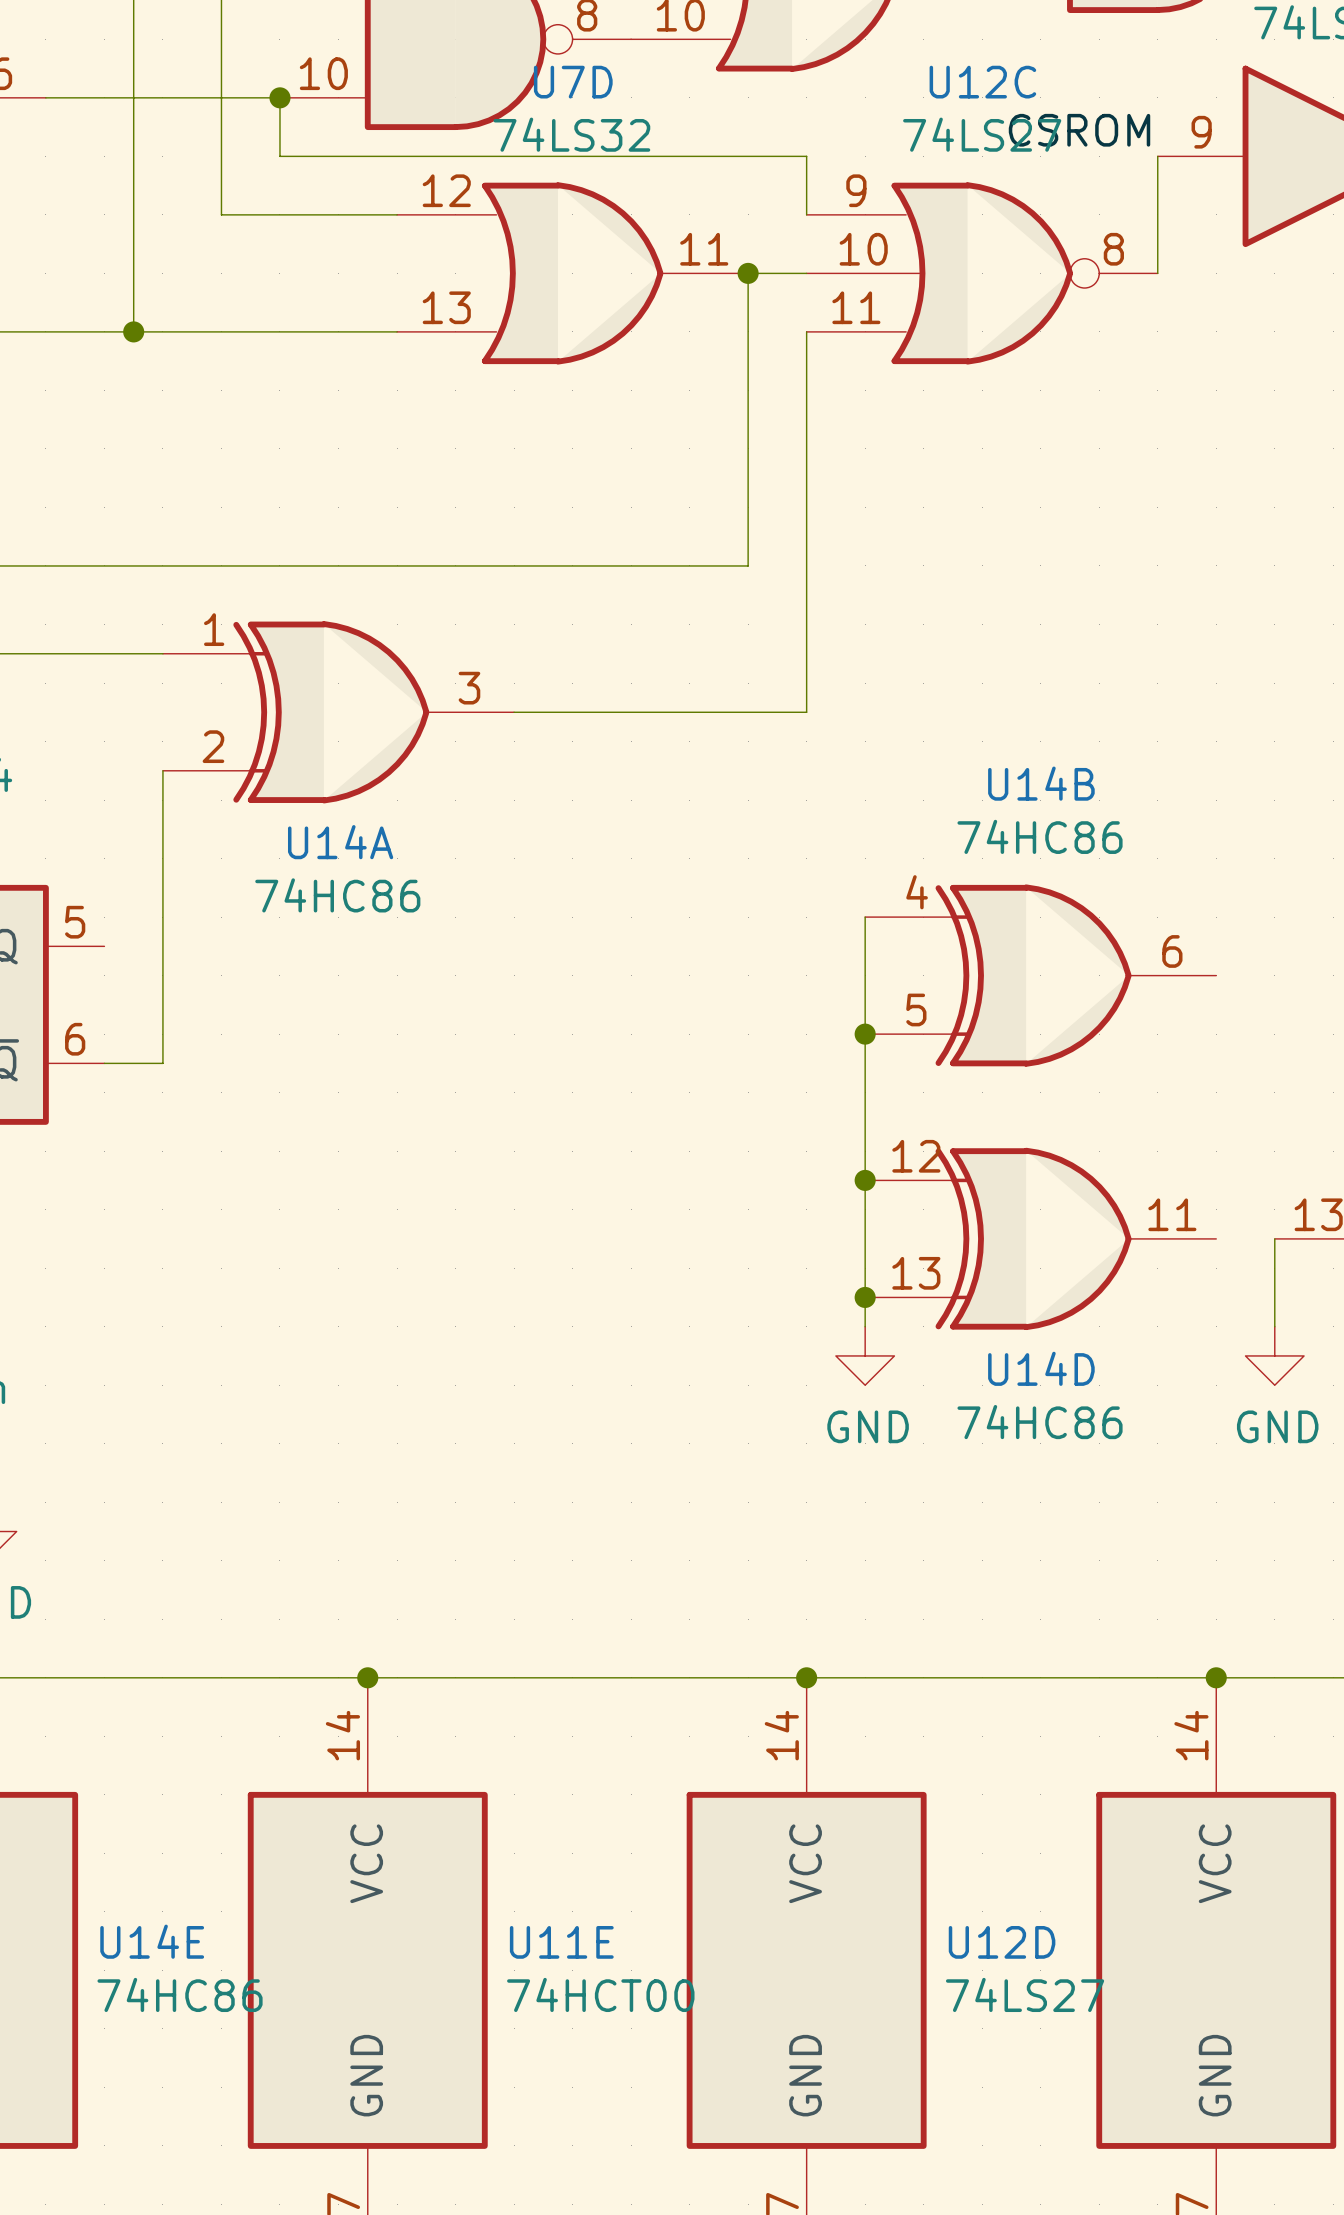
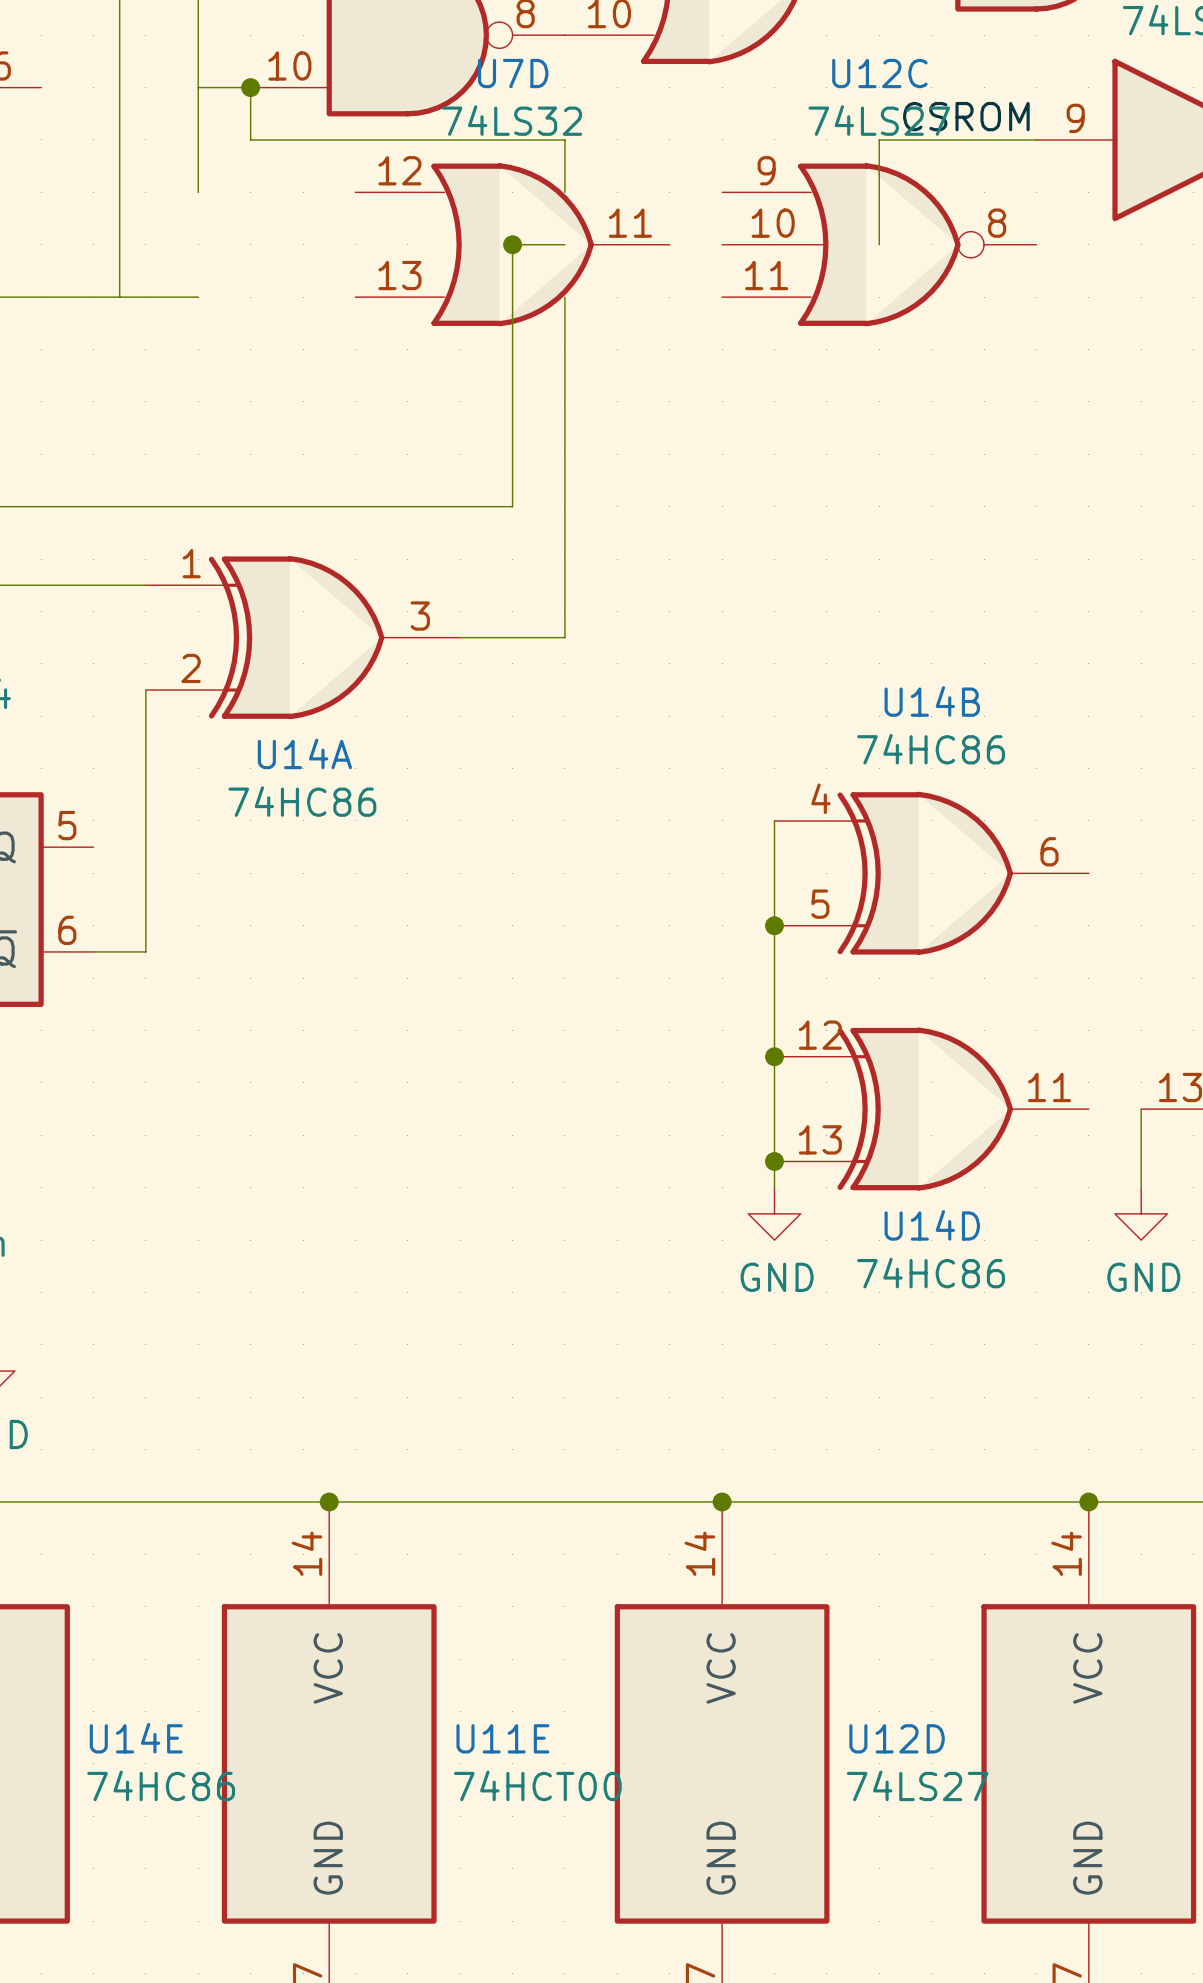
wire: (45, 97) (221, 97) -> none
wire: (631, 156) (806, 156) (806, 214) -> (564, 139) (564, 192)
wire: (1157, 156) (1157, 273) -> (1036, 139) (879, 139) (879, 244)
wire: (221, 214) (397, 214) -> none
junction: none -> (512, 244)
junction: (748, 273) -> none
wire: (806, 273) (748, 273) (748, 565) (572, 565) -> (564, 244) (512, 244) (512, 506)
junction: (133, 331) -> none
wire: (221, 331) (397, 331) -> none
wire: (806, 331) (806, 712) (631, 712) -> (564, 297) (564, 637)

